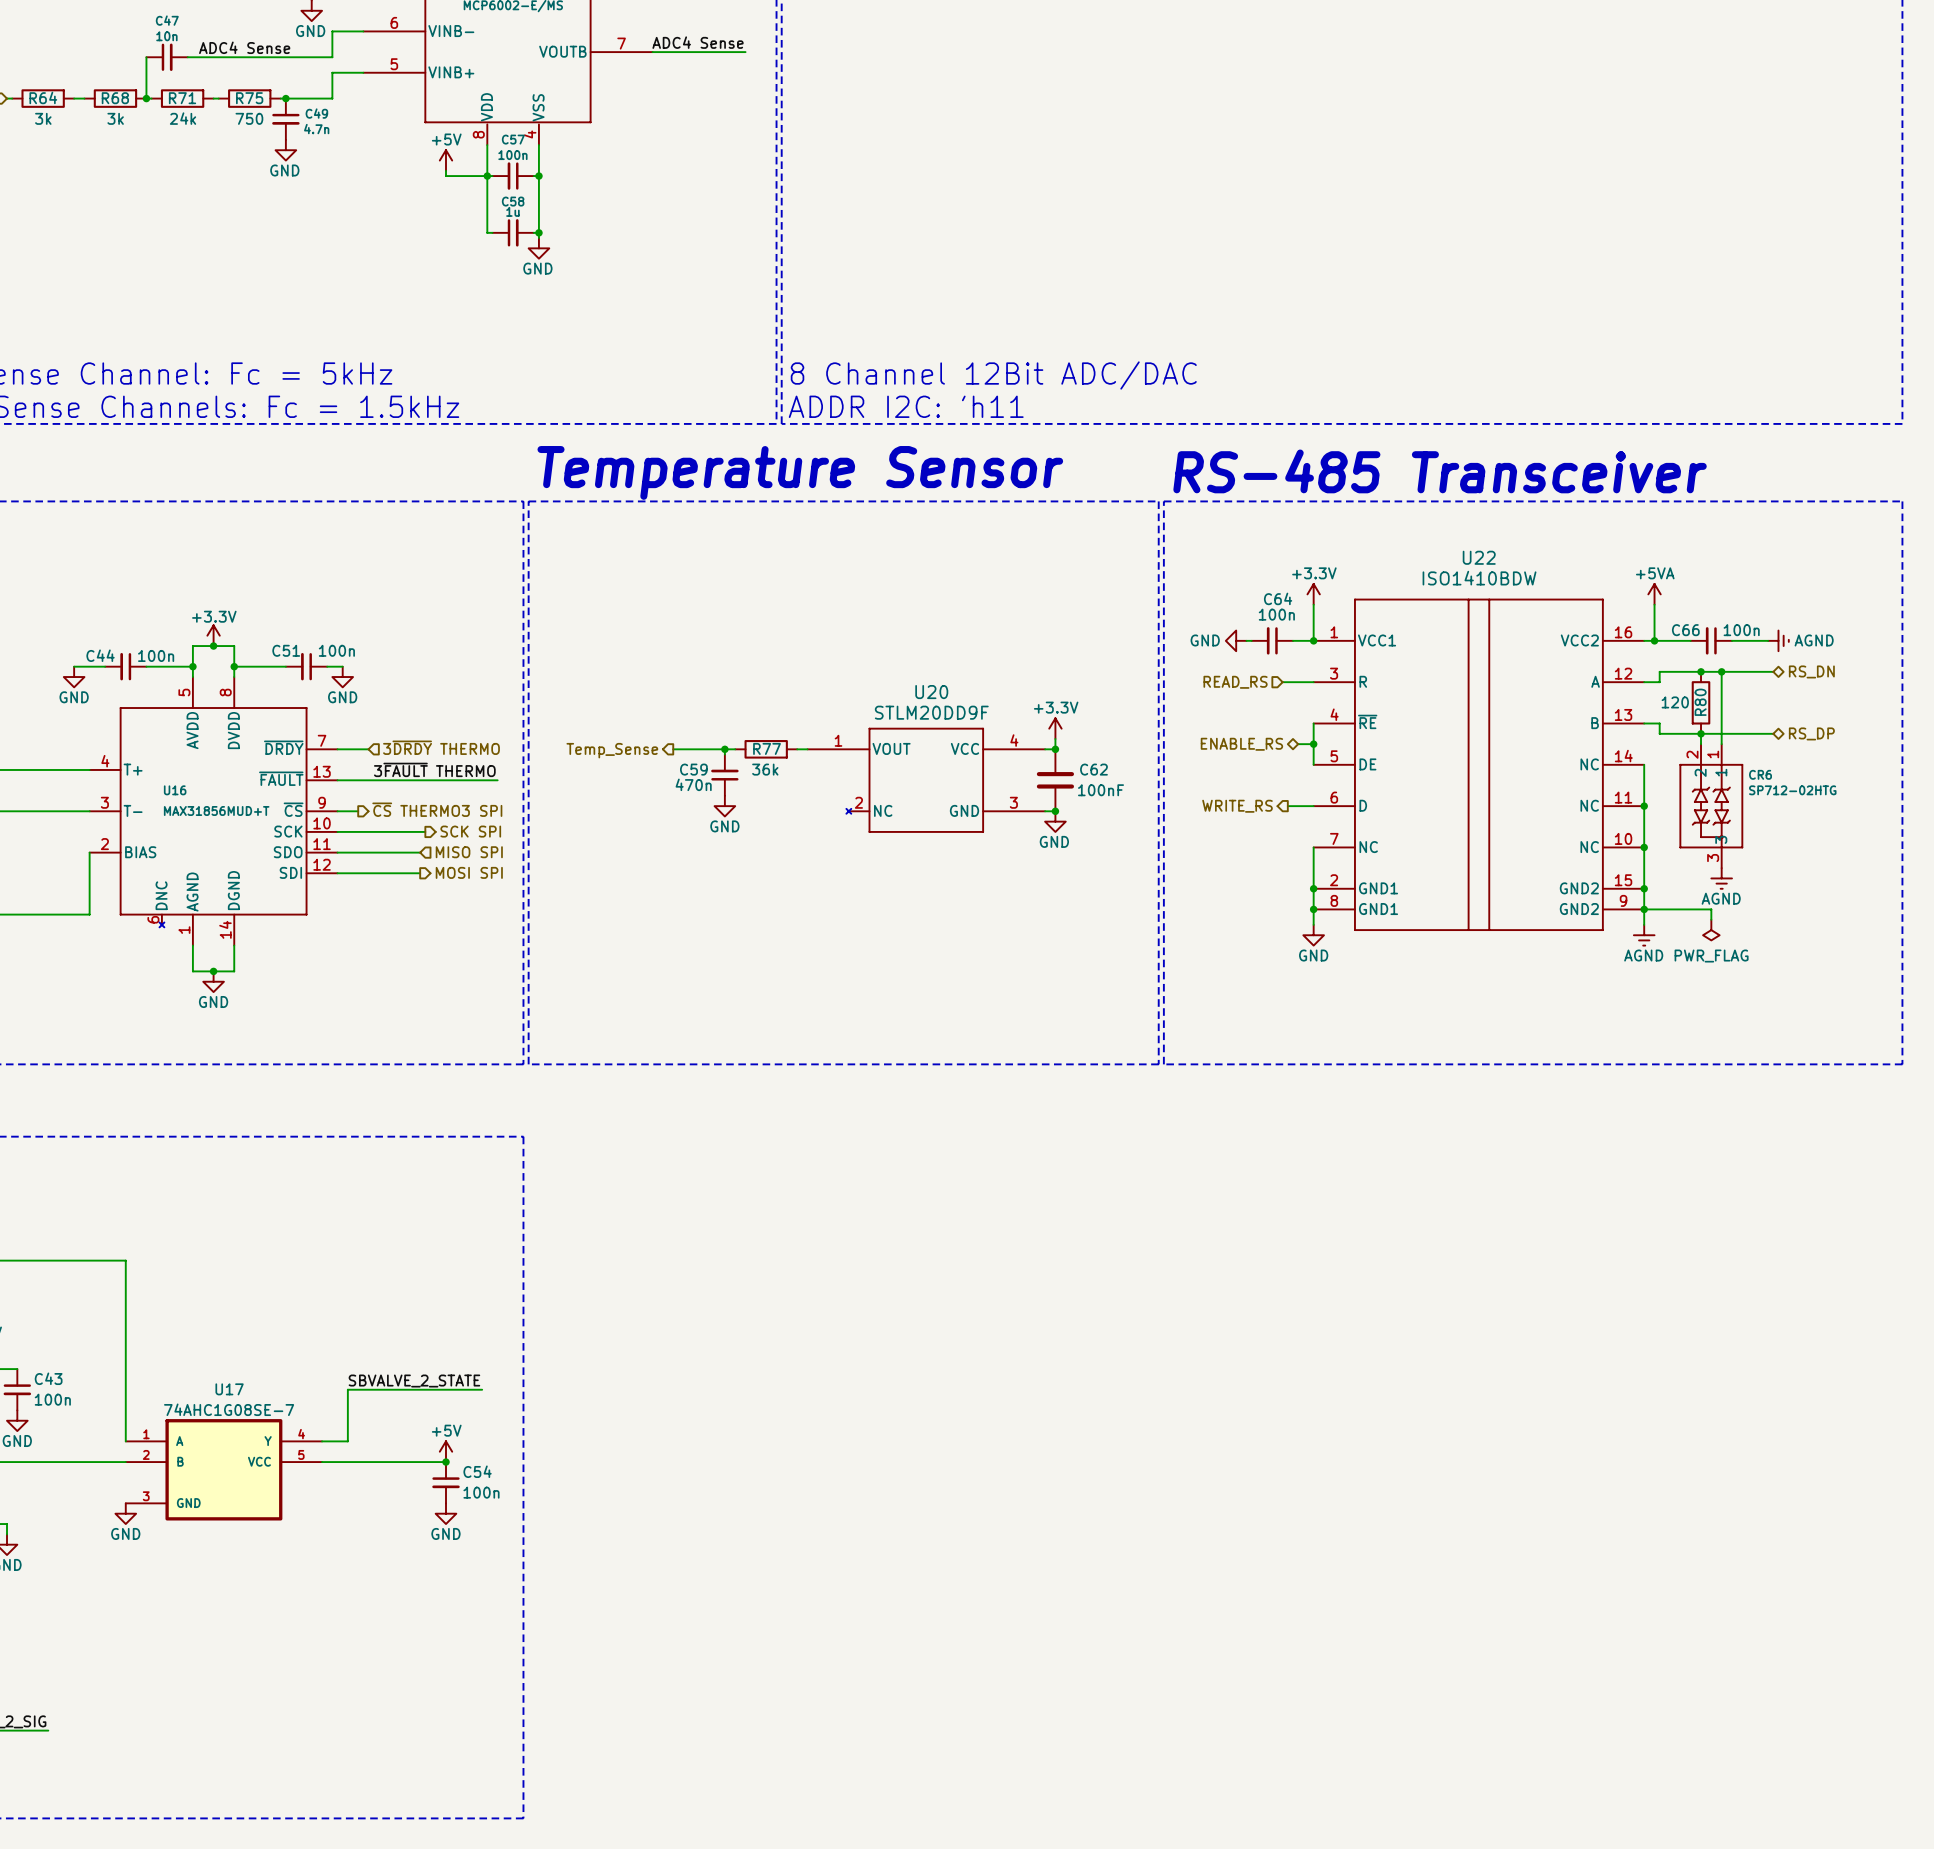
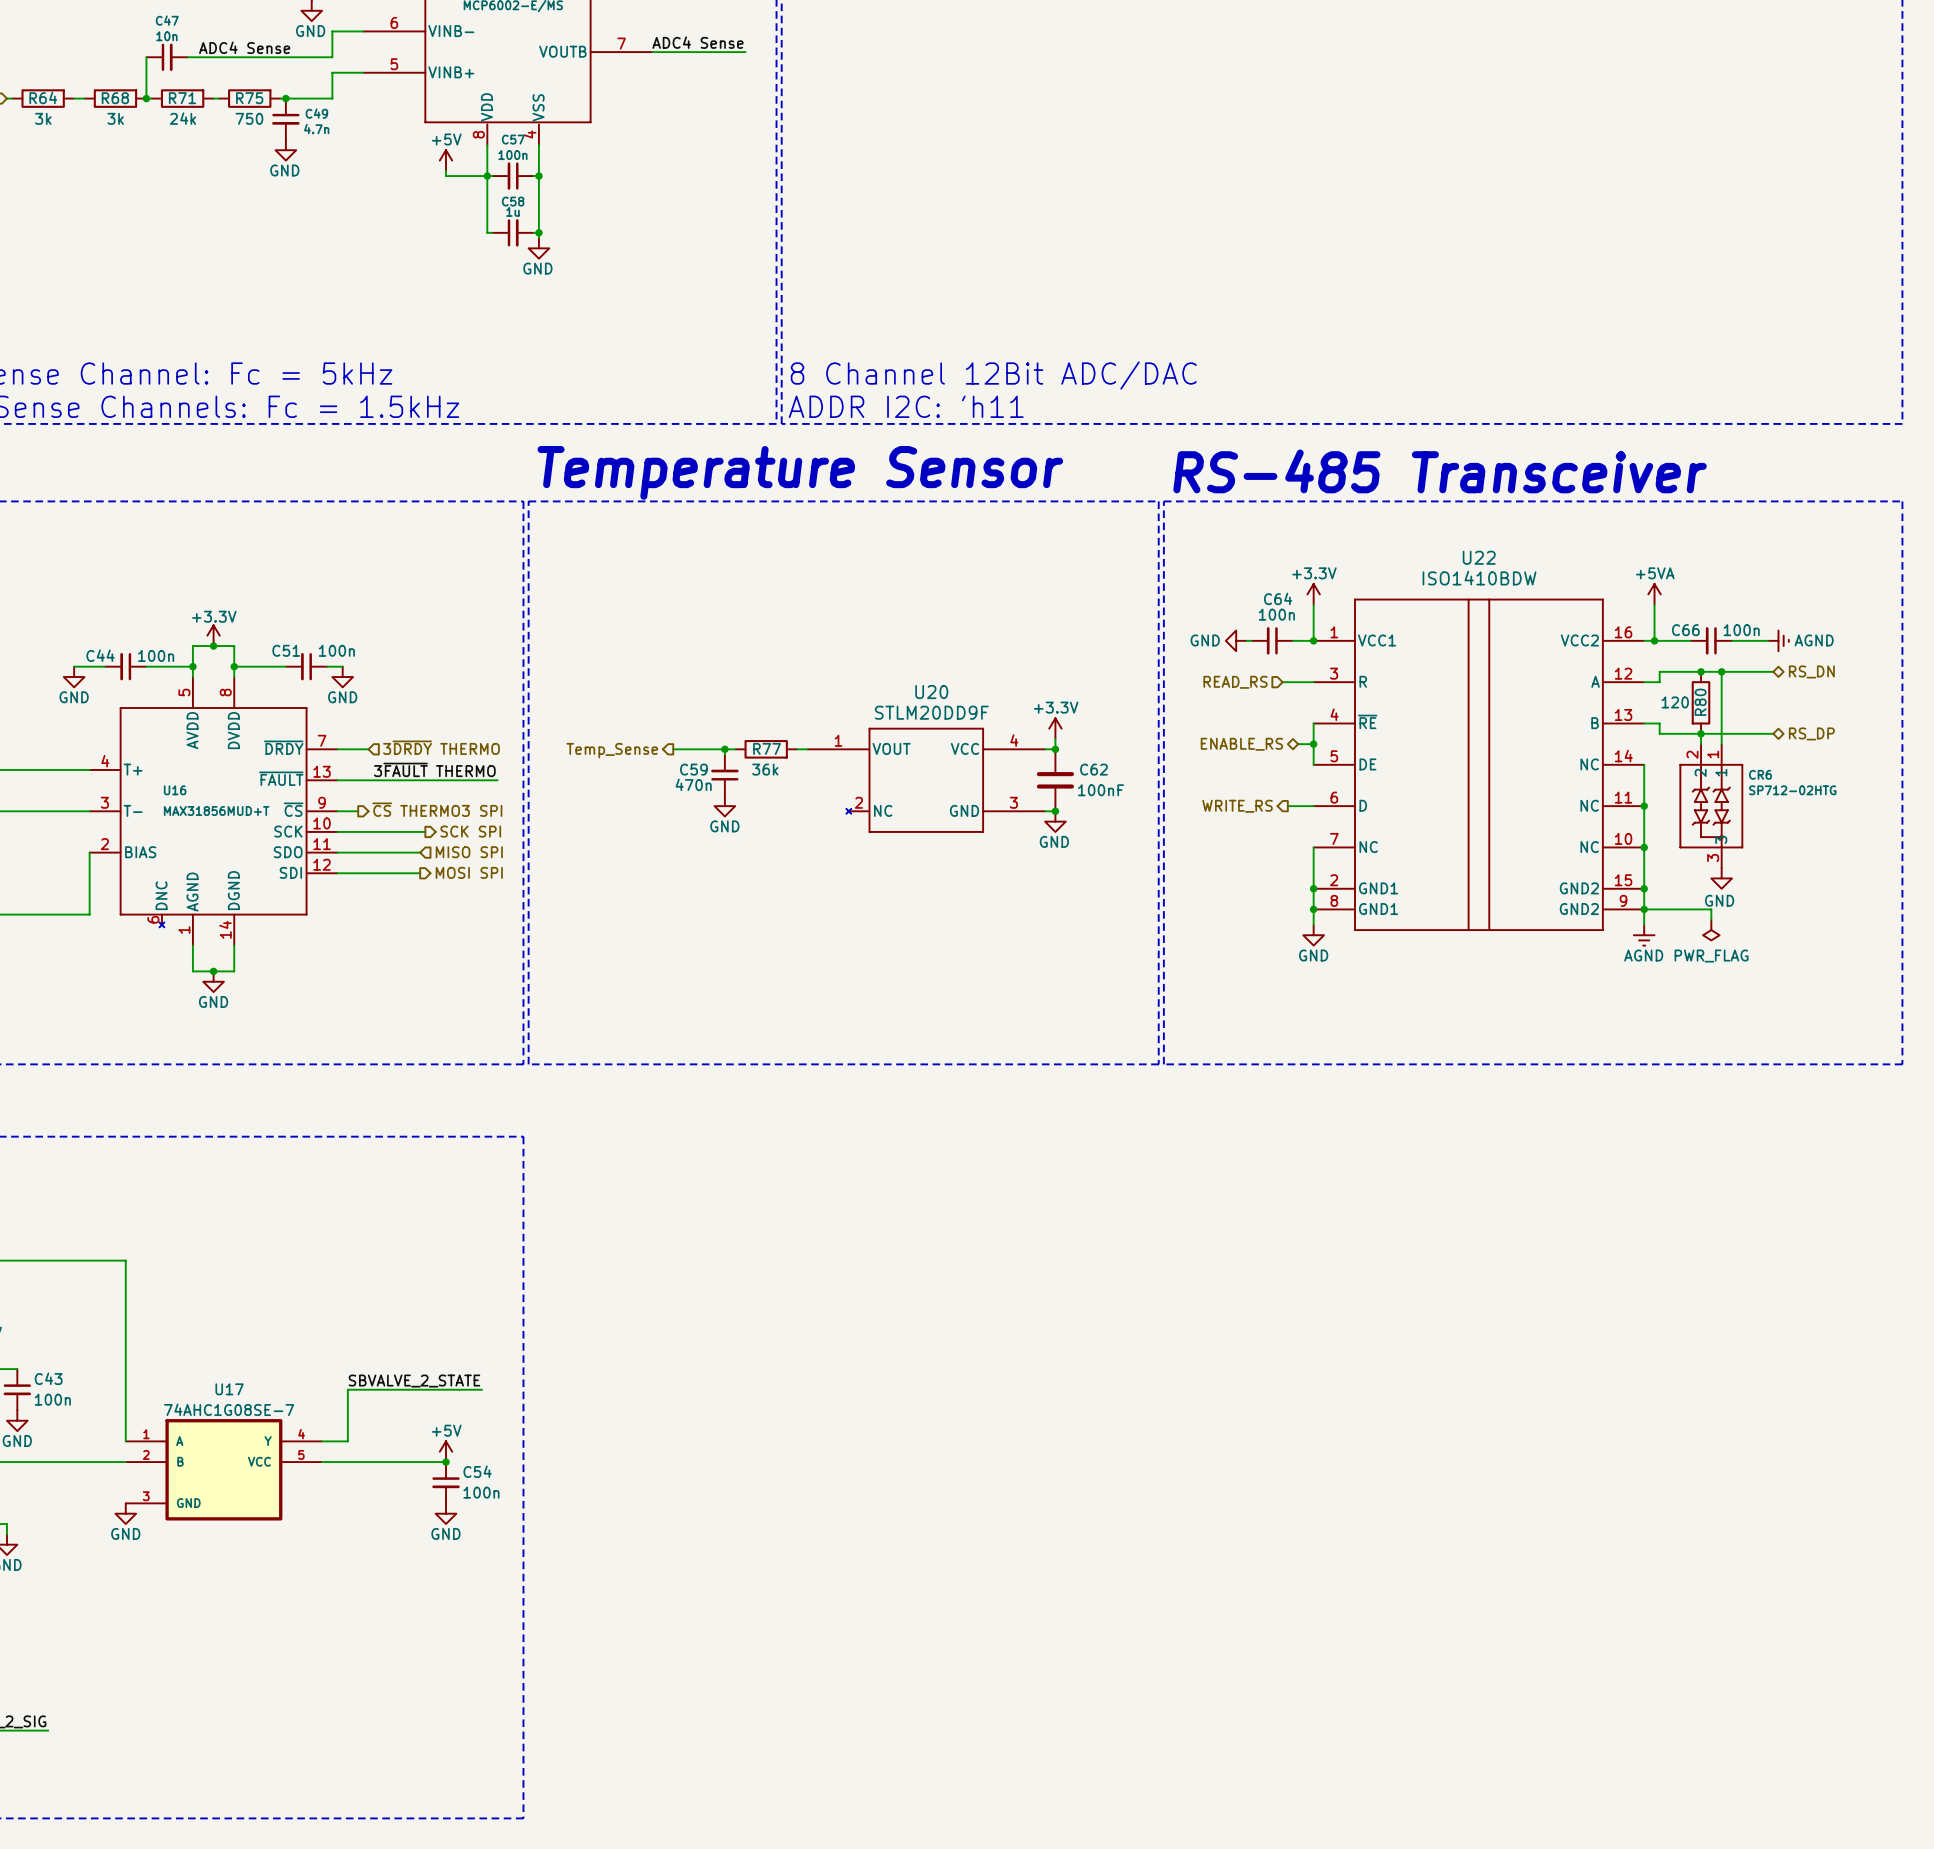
power symbol: AGND (1721, 878) -> GND (1721, 878)

